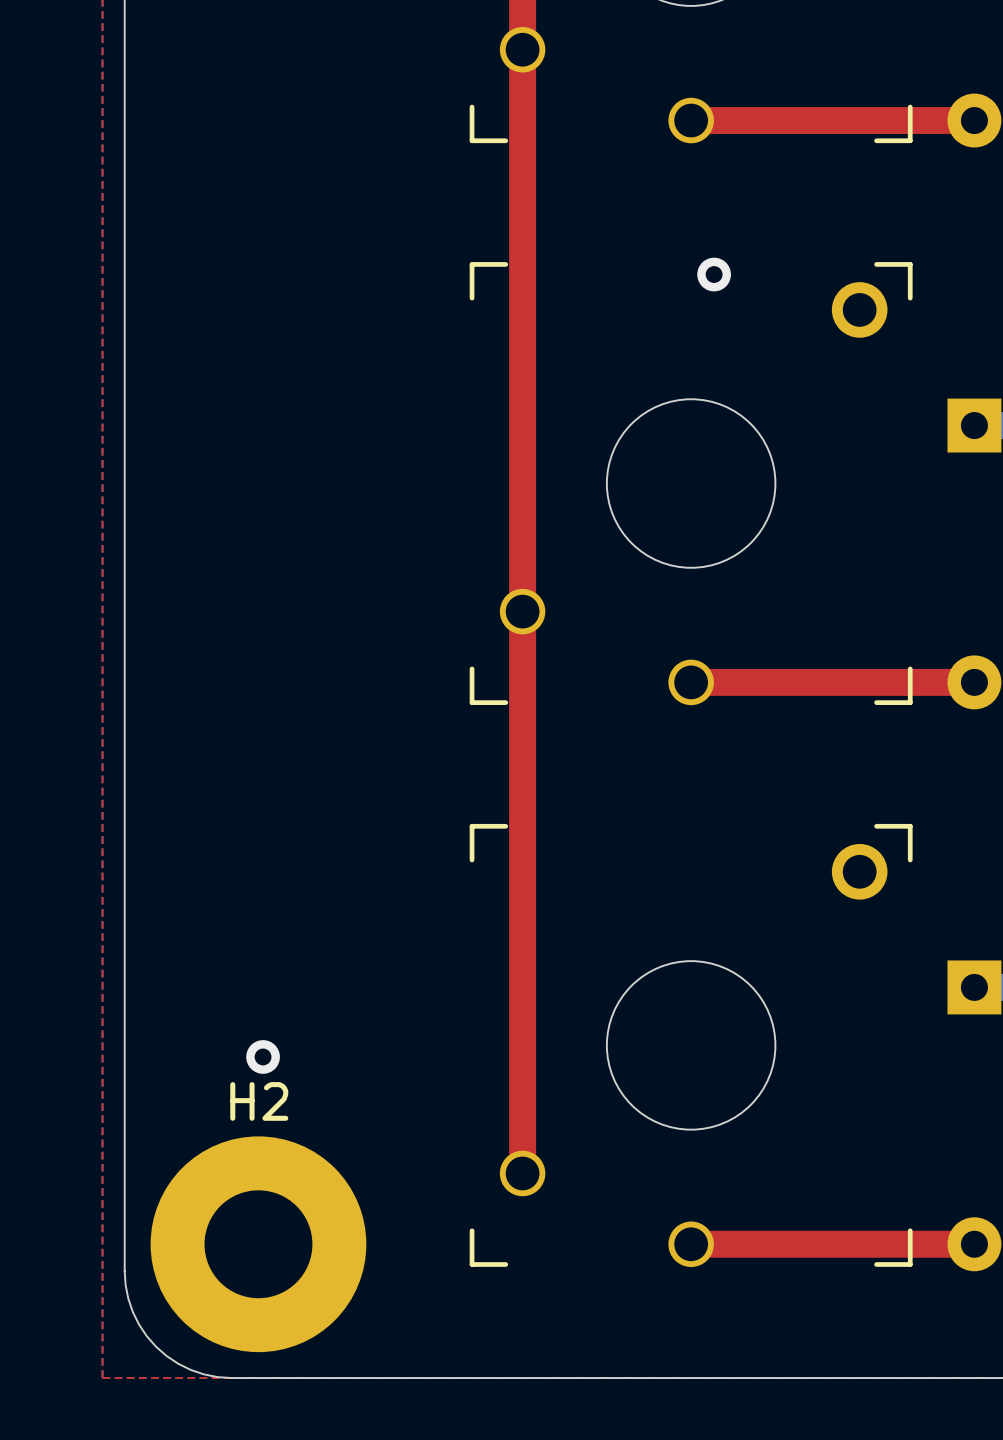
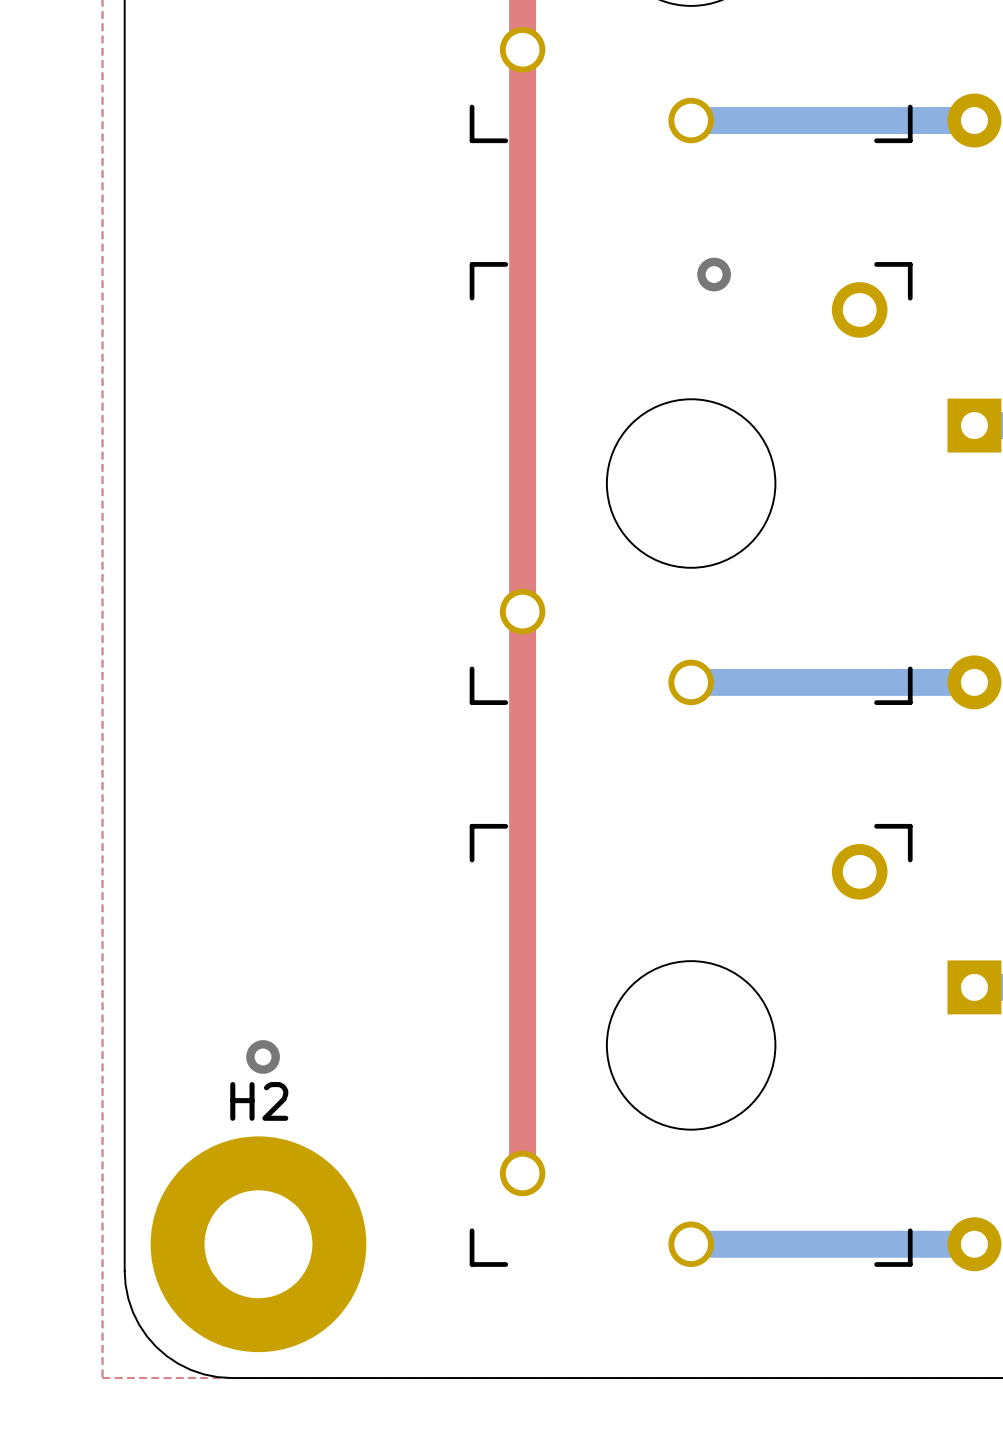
bottom track: none -> (691, 120) (974, 120)
top track: (691, 120) (974, 120) -> none
bottom track: none -> (691, 682) (974, 682)
top track: (691, 682) (974, 682) -> none
bottom track: none -> (691, 1244) (974, 1244)
top track: (691, 1244) (974, 1244) -> none

